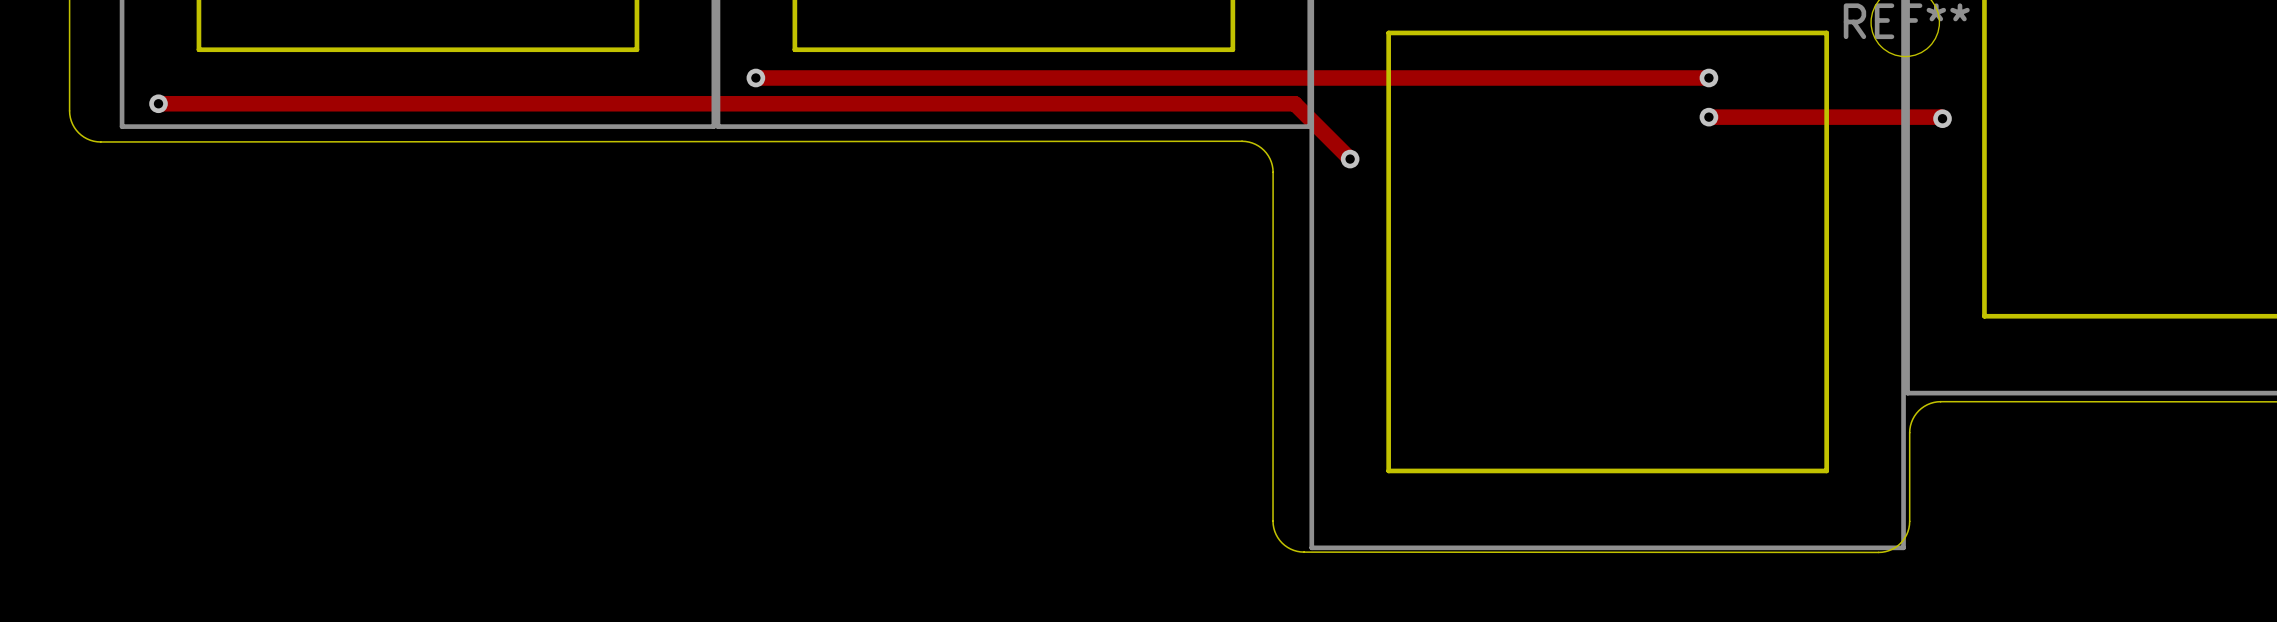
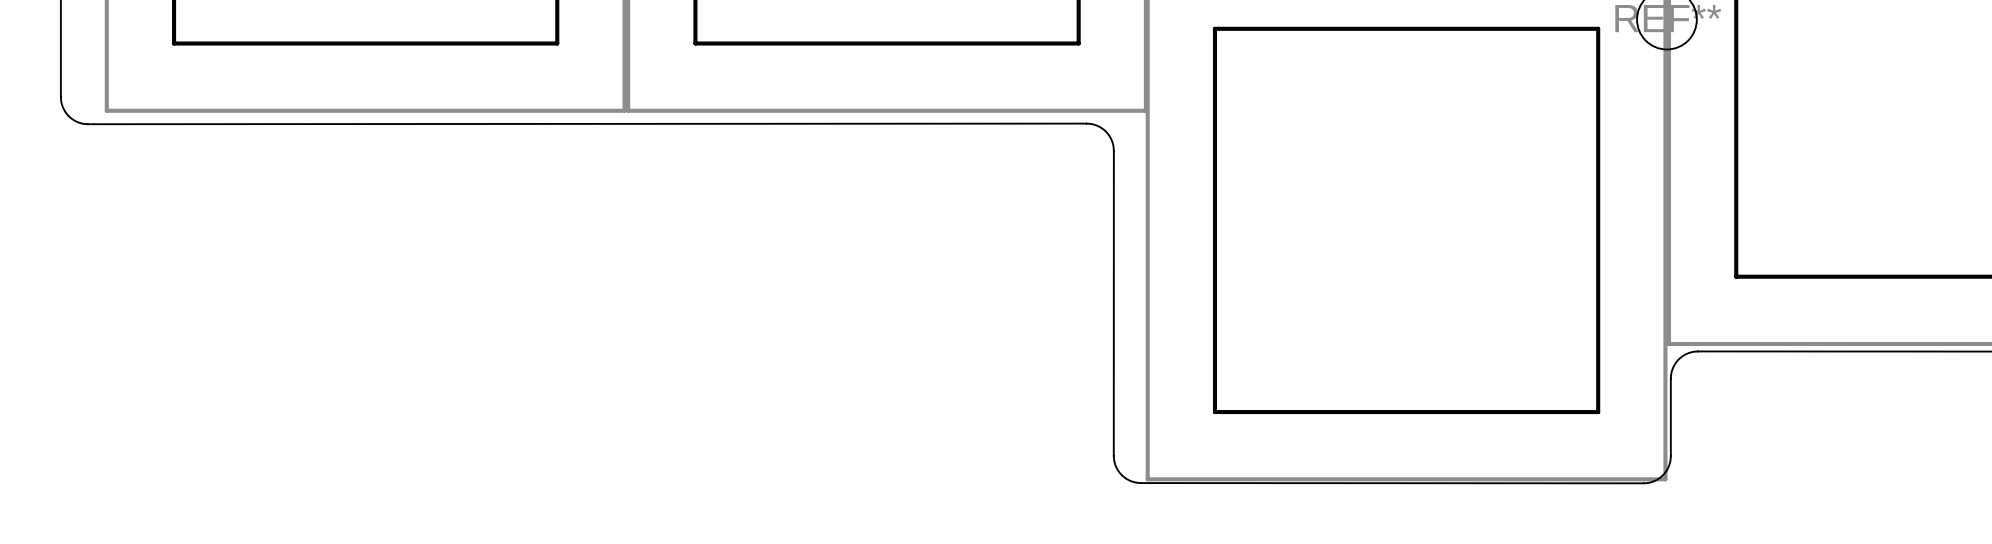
track: (755, 77) (1708, 77) -> none
via: (755, 77) -> none
via: (1708, 77) -> none
track: (158, 103) (1294, 103) (1350, 159) -> none
via: (158, 103) -> none
track: (1708, 117) (1940, 117) (1942, 118) -> none
via: (1708, 117) -> none
via: (1942, 118) -> none
via: (1350, 159) -> none

